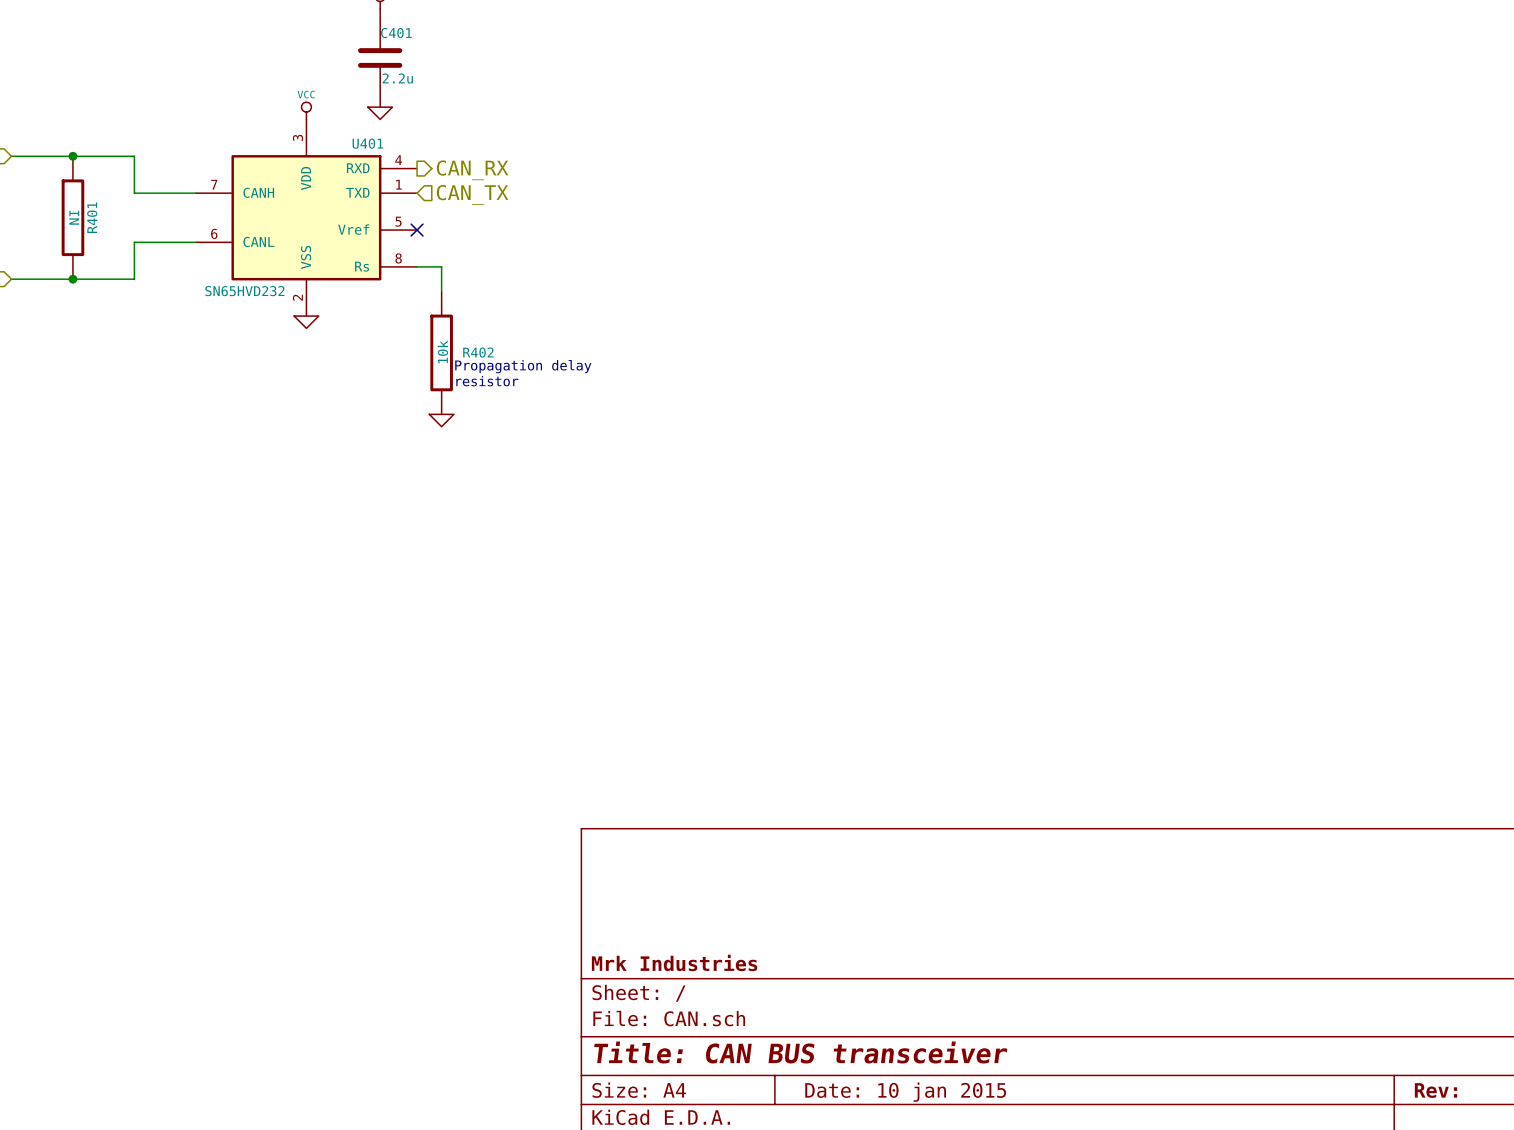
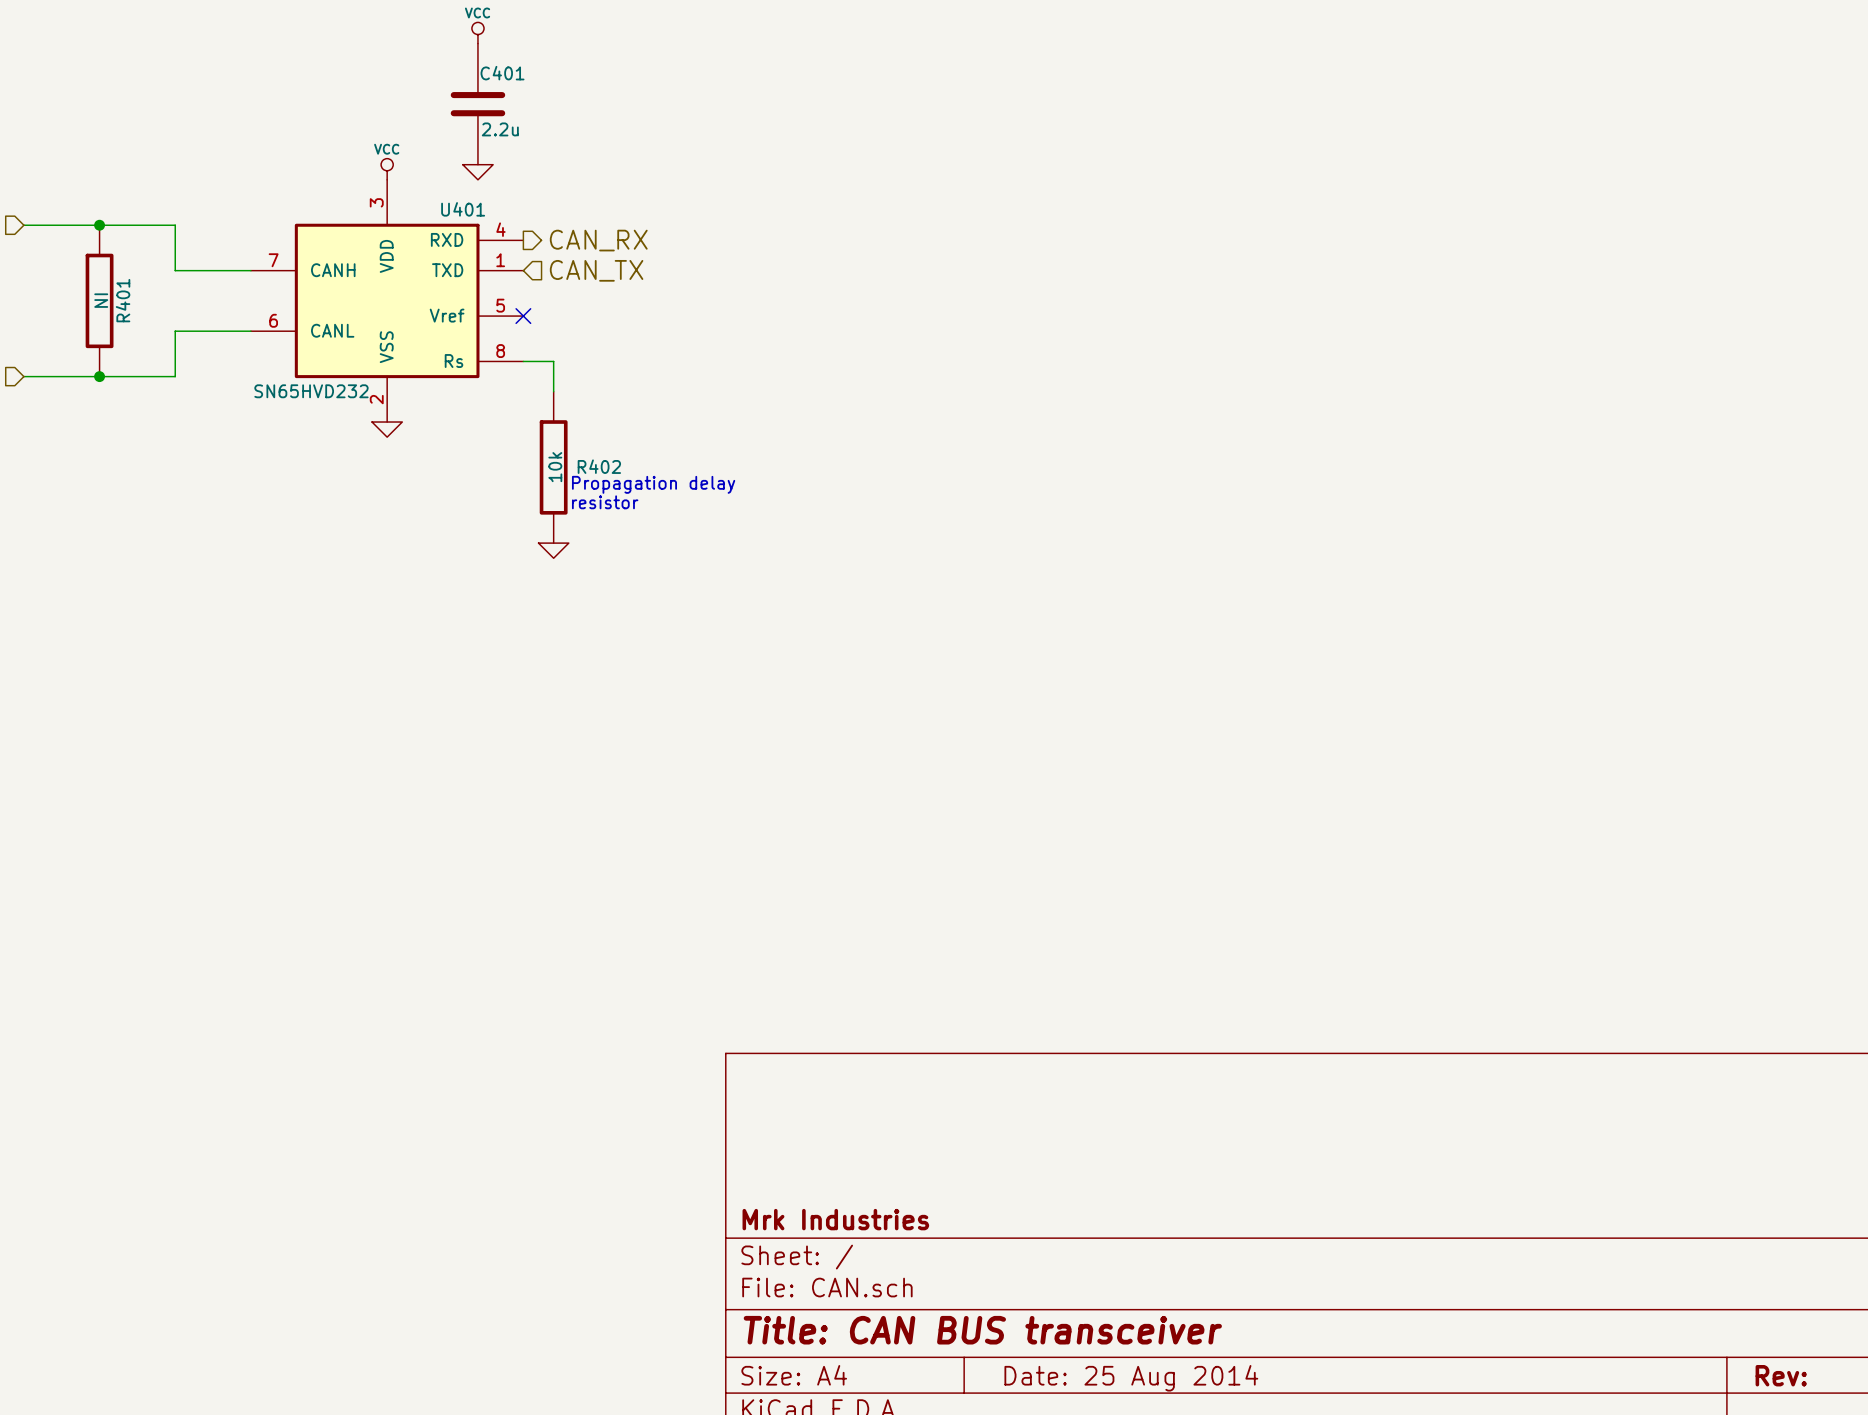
title block: Date: 10 jan 2015 (905, 1092) -> Date: 25 Aug 2014 (1131, 1378)

